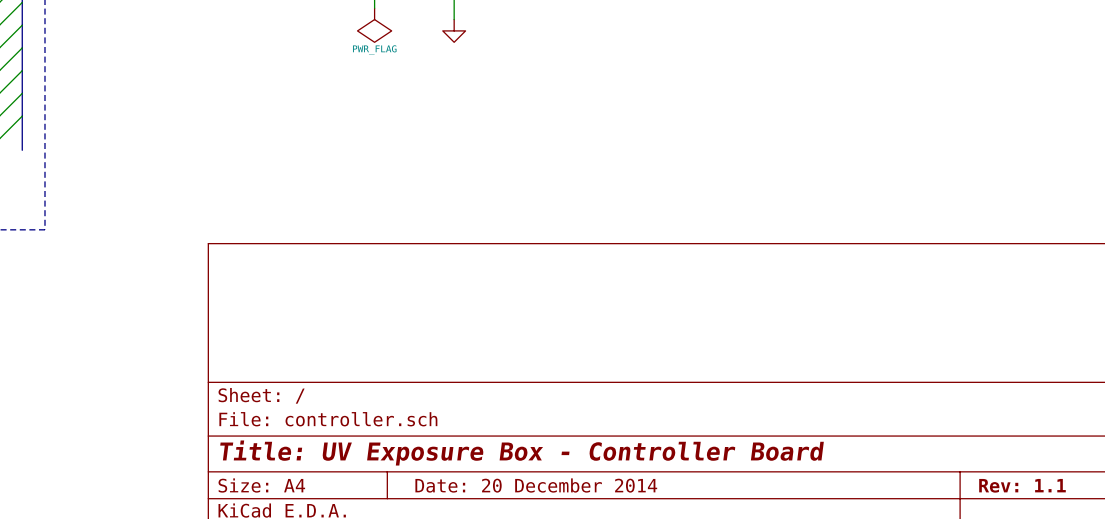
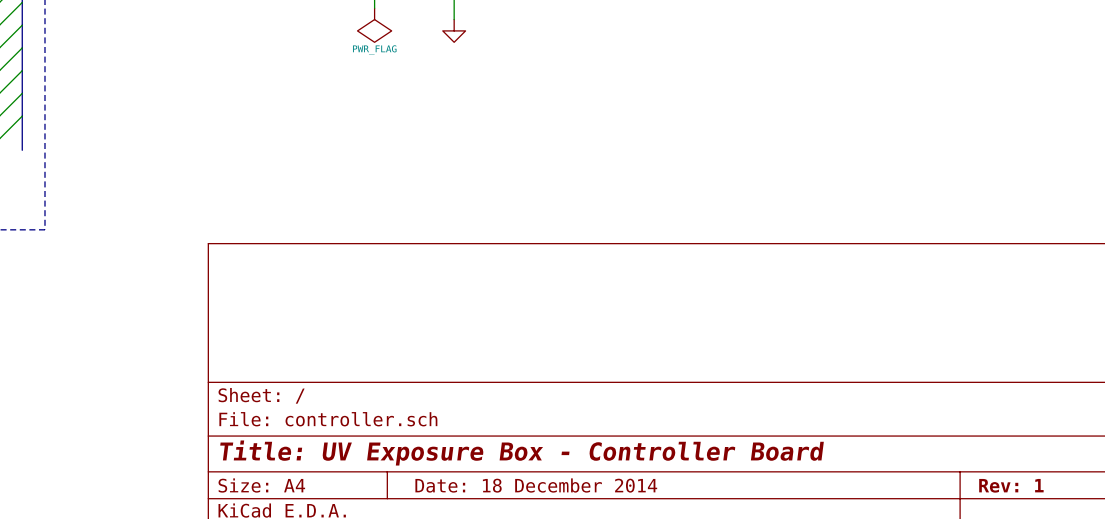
title block: Date: 20 December 2014 (536, 485) -> Date: 18 December 2014 (536, 485)
title block: Rev: 1.1 (1022, 485) -> Rev: 1 (1011, 485)

